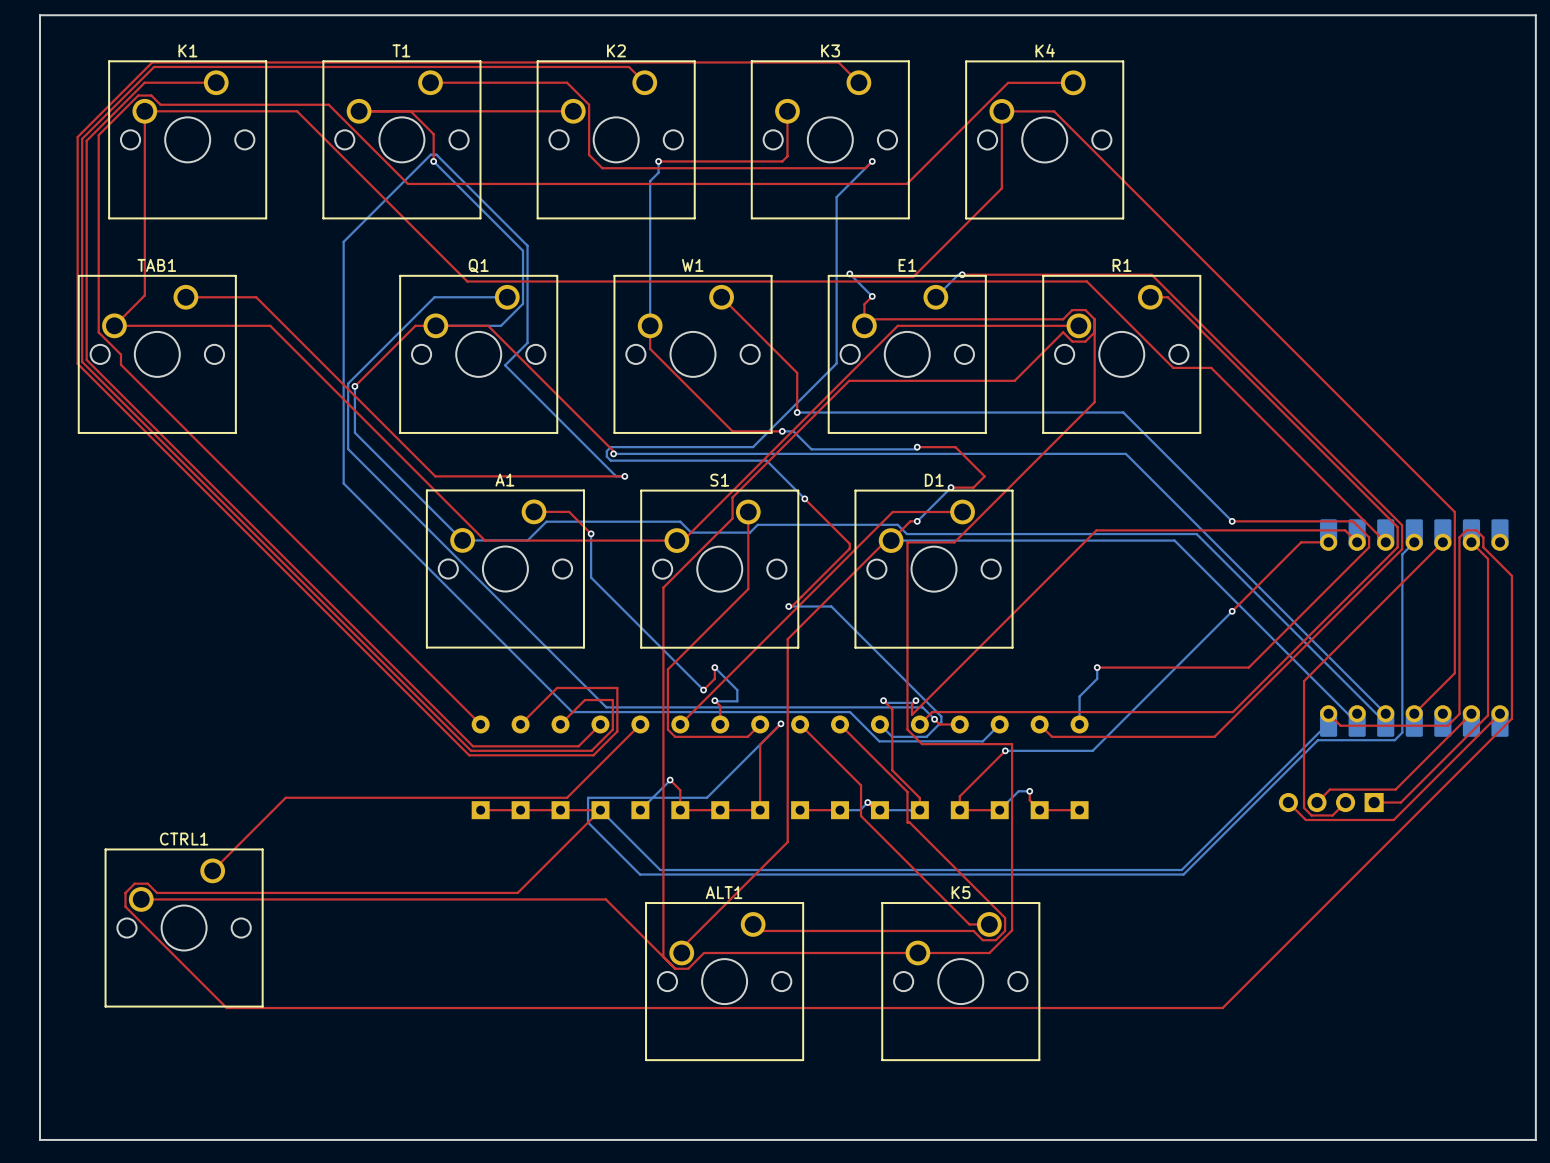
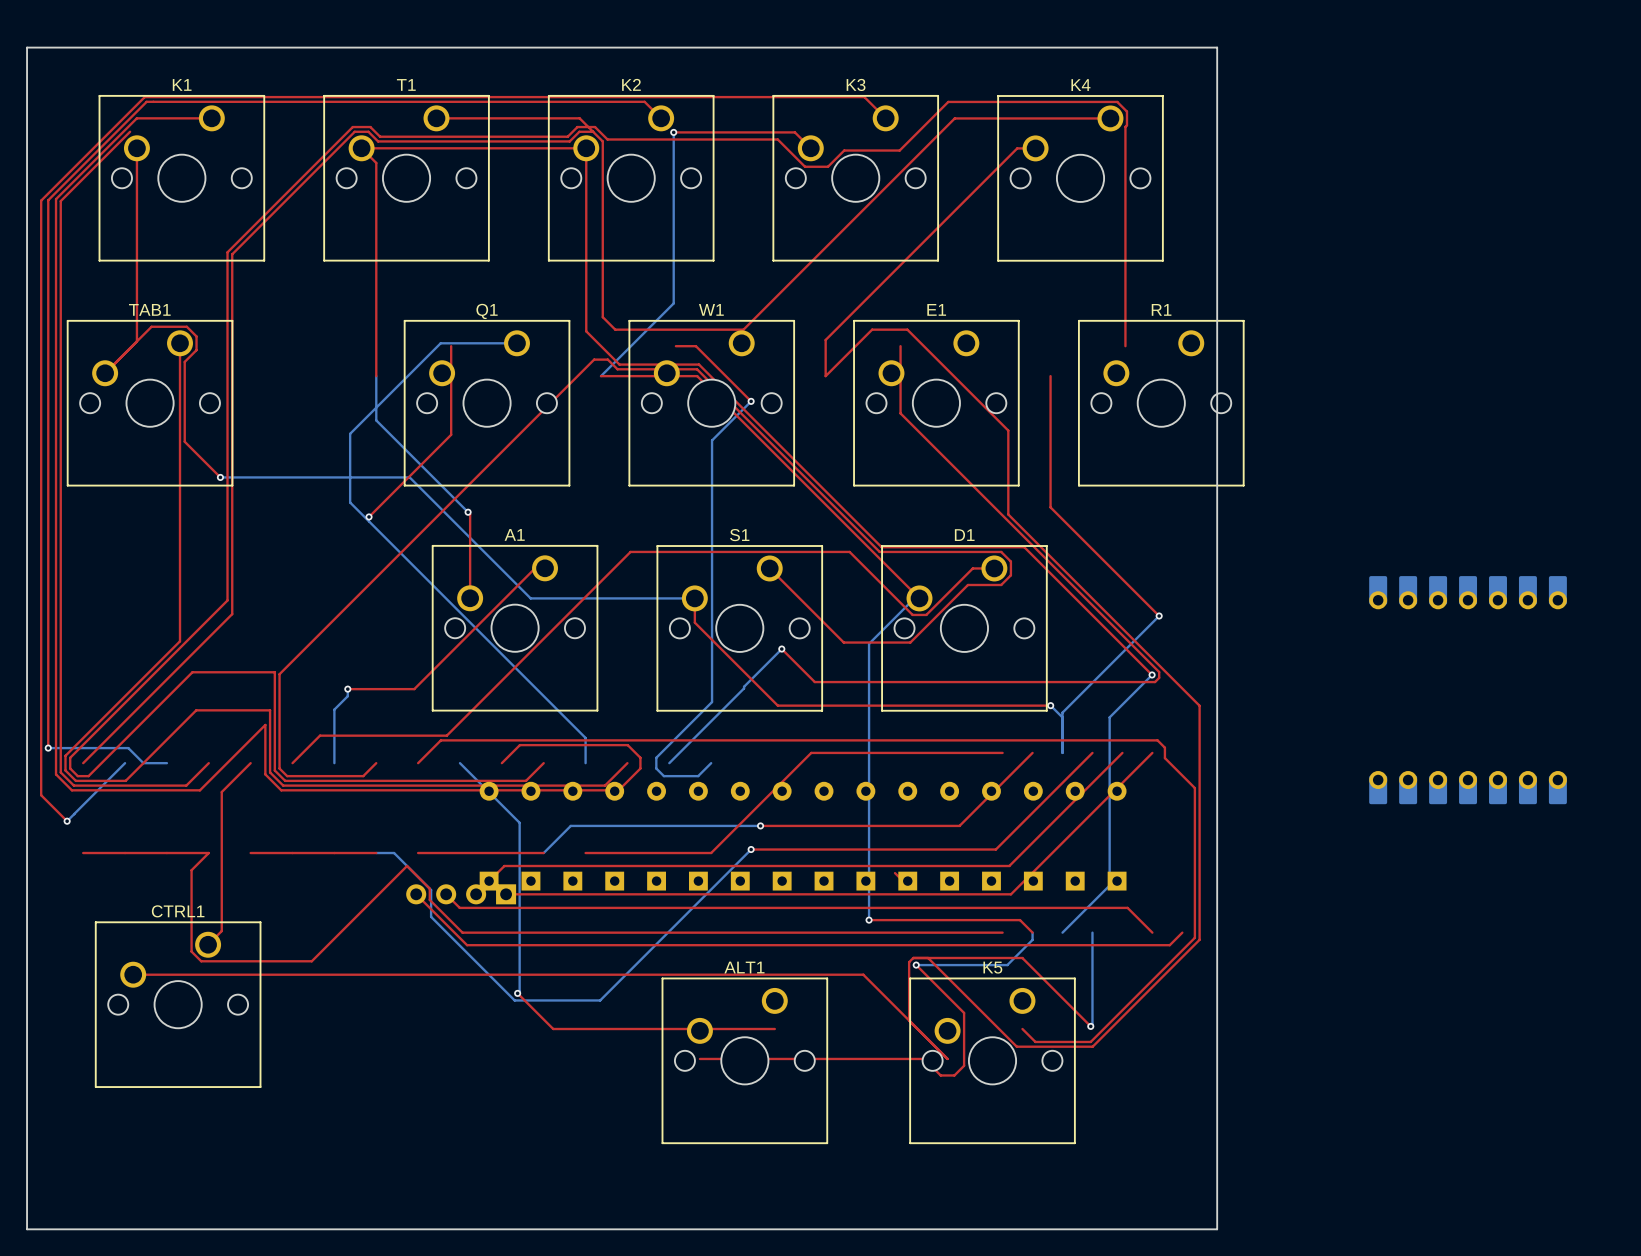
board edge: (1175, 15) (1535, 15) (1535, 1139) (40, 1139) -> (1217, 47) (1217, 1229) (27, 1229) (27, 1226)
top track: (1008, 82) (907, 183) (407, 183) (328, 104) (160, 104) (151, 95) (138, 95) -> none
top track: none -> (593, 131) (579, 131) (569, 141) (378, 141) (368, 131) (354, 131) (232, 254) (232, 614) (83, 763)
bottom track: none -> (673, 132) (673, 303) (601, 376)
top track: (144, 111) (297, 111) (467, 281) (1086, 281) (1173, 367) (1211, 367) (1385, 542) -> none
top track: none -> (361, 148) (376, 162) (376, 376)
top track: (410, 111) (433, 134) (433, 161) -> none
top track: none -> (586, 148) (586, 331) (619, 364) (699, 364) (881, 547) (1024, 547) (1152, 674)
top track: (787, 111) (787, 156) (782, 161) (658, 161) -> (810, 148) (794, 132) (673, 132)
top track: none -> (1035, 148) (1017, 148) (825, 339) (825, 376) (872, 329) (907, 329) (1008, 430) (1008, 514) (1199, 705) (1199, 939) (1092, 1046) (1016, 1046) (928, 957)
top track: (98, 135) (98, 332) (120, 354) (120, 364) (480, 724) -> (88, 173) (60, 201) (60, 772) (73, 785) (186, 785) (208, 763)
top track: (77, 137) (77, 363) (469, 755) (593, 755) (617, 731) (617, 687) (557, 687) (520, 724) -> (66, 175) (41, 200) (41, 795) (67, 821)
top track: (82, 138) (82, 361) (471, 750) (591, 750) (612, 729) (612, 700) (584, 700) (560, 724) -> (71, 177) (48, 200) (48, 748)
top track: (86, 140) (86, 359) (472, 746) (578, 746) (600, 724) -> (75, 179) (56, 199) (56, 774) (71, 790) (199, 790) (265, 724) (265, 774) (281, 790) (618, 790) (640, 768) (640, 757) (627, 745) (519, 745) (501, 763)
top track: (589, 154) (602, 168) (865, 168) (872, 161) -> (602, 194) (602, 317) (615, 329) (743, 329) (954, 118) (1042, 118)
bottom track: (433, 161) (523, 250) (523, 303) (500, 325) (435, 325) -> none
via: (433, 161) -> none
bottom track: (658, 161) (658, 172) (650, 181) (650, 325) -> none
via position: (658, 161) -> (673, 132)
bottom track: (872, 161) (836, 197) (836, 363) (753, 447) (610, 447) (606, 451) (606, 456) (610, 460) (766, 460) (804, 498) -> none
via: (872, 161) -> none
top track: (849, 273) (852, 276) (913, 276) (1001, 188) (1001, 111) (1054, 111) (1454, 512) (1454, 673) (1414, 713) -> none
bottom track: (849, 273) (872, 296) -> none
via: (849, 273) -> none
top track: (962, 274) (1151, 274) (1402, 525) (1402, 549) (1214, 736) (1052, 736) (1039, 724) -> none
bottom track: (962, 274) (958, 274) (935, 297) -> none
via: (962, 274) -> none
top track: none -> (136, 341) (151, 326) (186, 326) (196, 336) (196, 350) (184, 361) (184, 441) (220, 477)
top track: (872, 296) (864, 304) (864, 325) (870, 319) (1063, 319) (1072, 310) (1085, 310) (1094, 319) (1094, 402) (978, 518) -> (376, 763) (363, 776) (287, 776) (279, 768) (279, 674) (594, 359) (607, 359) (617, 369) (697, 369) (879, 551) (1001, 551) (1010, 561) (1010, 575)
via: (872, 296) -> none
top track: (185, 297) (256, 297) (435, 476) (624, 476) -> (180, 343) (180, 641) (65, 755) (65, 770) (75, 780) (125, 780) (196, 710) (270, 710) (270, 772) (283, 785) (605, 785) (627, 763)
top track: (721, 297) (797, 372) (797, 412) -> none
top track: (1150, 297) (1167, 297) (1397, 527) (1397, 547) (1232, 712) (932, 712) (919, 724) -> none
top track: none -> (451, 346) (451, 434) (369, 516)
top track: none -> (675, 346) (695, 346) (751, 401)
top track: none -> (900, 346) (900, 413) (1159, 672) (1159, 677) (1155, 682) (814, 682) (781, 649)
top track: none -> (1125, 346) (1126, 111) (1117, 101) (948, 101) (899, 150) (844, 150) (828, 166) (805, 166) (777, 139) (607, 139) (595, 127) (577, 127) (567, 136) (380, 136) (370, 127) (352, 127) (227, 252) (227, 600) (70, 757) (70, 768) (77, 776) (88, 776) (192, 672) (274, 672) (274, 770) (285, 780) (526, 780) (543, 763)
top track: (114, 325) (270, 325) (485, 540) (683, 540) (897, 325) (1078, 325) -> none
top track: (650, 325) (650, 348) (732, 431) (782, 431) -> none
bottom track: none -> (376, 376) (376, 420) (468, 512)
top track: none -> (601, 376) (697, 376) (919, 598)
top track: none -> (1050, 376) (1050, 507) (1159, 616)
top track: (1094, 332) (1085, 341) (1072, 341) (1063, 332) (1014, 380) (849, 380) (732, 497) (732, 518) (663, 587) (663, 956) -> none
bottom track: none -> (751, 401) (712, 440) (712, 702) (656, 757) (656, 768) (663, 776) (698, 776) (711, 763)
via: none -> (751, 401)
top track: (354, 386) (415, 325) (488, 325) (613, 451) (613, 453) -> none
bottom track: (354, 386) (354, 432) (462, 540) (527, 540) (546, 521) (680, 521) (691, 532) (750, 532) (757, 524) (897, 524) (906, 534) (1196, 534) (1385, 723) -> none
via: (354, 386) -> none
bottom track: (797, 412) (1123, 412) (1232, 521) -> none
via: (797, 412) -> none
bottom track: none -> (220, 477) (409, 477) (530, 598) (694, 598)
via: none -> (220, 477)
bottom track: (782, 431) (793, 431) (811, 449) (917, 449) (917, 447) -> none
via: (782, 431) -> none
top track: (917, 447) (955, 447) (984, 476) (973, 487) (951, 487) -> none
via: (917, 447) -> none
bottom track: (613, 453) (1125, 453) (1385, 713) -> none
via: (613, 453) -> none
top track: none -> (468, 512) (470, 514) (470, 598)
via: none -> (468, 512)
via: none -> (369, 516)
bottom track: (624, 476) (616, 476) (505, 365) (527, 342) (527, 245) (436, 154) (430, 154) (343, 241) (343, 483) (572, 712) (850, 712) (879, 741) (982, 741) (999, 724) -> none
via: (624, 476) -> none
bottom track: (951, 487) (917, 521) -> none
via: (951, 487) -> none
top track: (804, 498) (849, 543) (849, 548) (791, 606) (788, 606) -> none
via: (804, 498) -> none
top track: (534, 511) (569, 511) (591, 533) -> (545, 568) (535, 568) (414, 689) (347, 689)
top track: (748, 512) (748, 589) (667, 669) (667, 729) (675, 736) (747, 736) (760, 724) -> (769, 568) (843, 642) (910, 642) (967, 584) (1001, 584)
top track: (942, 512) (892, 512) (680, 724) -> (972, 568) (926, 614) (912, 614) (849, 551) (630, 551) (446, 735) (320, 735) (292, 763)
top track: (917, 521) (910, 521) (891, 540) (886, 540) (787, 639) (787, 842) (681, 948) (681, 953) -> none
via: (917, 521) -> none
top track: (1232, 521) (1353, 521) (1369, 537) (1369, 547) (1248, 667) (1097, 667) -> none
via: (1232, 521) -> none
top track: (969, 527) (954, 542) (907, 542) (907, 729) (922, 744) (1012, 744) (1012, 930) (989, 953) (704, 953) (688, 968) (675, 968) (605, 899) -> (947, 1058) (863, 974) (620, 974)
bottom track: (591, 533) (591, 577) (703, 690) -> none
via: (591, 533) -> none
top track: none -> (694, 598) (694, 622) (777, 705) (1050, 705)
bottom track: (891, 540) (1174, 540) (1357, 723) -> (919, 598) (914, 598) (869, 643) (869, 920)
top track: (1328, 542) (1301, 542) (1232, 611) -> none
top track: (1357, 542) (1345, 530) (1096, 530) (912, 714) (912, 704) (915, 700) -> none
bottom track: (1414, 542) (1402, 554) (1402, 732) (1394, 740) (1317, 740) (1183, 874) (640, 874) (588, 822) (588, 797) (706, 797) (780, 723) -> none
top track: (1442, 542) (1304, 681) (1304, 807) (1311, 815) (1332, 815) (1345, 802) -> none
top track: (1471, 542) (1488, 558) (1488, 715) (1400, 802) (1374, 802) -> none
bottom track: none -> (1159, 616) (1062, 712) (1062, 752)
via: none -> (1159, 616)
bottom track: none -> (781, 649) (669, 763)
bottom track: (788, 606) (831, 606) (941, 716) (941, 722) (926, 736) (892, 736) (879, 724) -> none
via position: (788, 606) -> (781, 649)
bottom track: (1232, 611) (1092, 750) (1005, 750) -> none
via: (1232, 611) -> none
bottom track: none -> (1152, 674) (1109, 717) (1109, 885) (1062, 932)
via: none -> (1152, 674)
bottom track: none -> (347, 689) (347, 696) (334, 709) (334, 763)
via: none -> (347, 689)
bottom track: none -> (1050, 705) (1062, 717)
via: none -> (1050, 705)
top track: (714, 667) (714, 678) (703, 690) -> none
bottom track: (714, 667) (737, 690) (737, 701) (714, 700) -> none
via: (714, 667) -> none
bottom track: (1097, 667) (1097, 678) (1079, 696) (1079, 724) -> none
via: (1097, 667) -> none
bottom track: (572, 673) (606, 707) (922, 707) (934, 719) -> (585, 737) (585, 763)
bottom track: none -> (48, 748) (128, 748) (143, 763) (166, 763)
via: none -> (48, 748)
top track: none -> (1002, 752) (811, 752) (711, 853) (585, 853)
top track: none -> (1032, 752) (959, 825) (760, 825)
top track: none -> (1092, 752) (995, 849) (751, 849)
top track: none -> (1122, 752) (1009, 866) (504, 866) (476, 894)
top track: none -> (1152, 752) (1010, 894) (506, 894)
via: (703, 690) -> none
top track: none -> (418, 763) (440, 740) (1157, 740) (1164, 747) (1164, 758) (1194, 788) (1194, 937) (1090, 1041) (1035, 1041) (1022, 1029)
bottom track: none -> (459, 763) (519, 822) (519, 991) (517, 993)
top track: (714, 700) (720, 706) (720, 724) -> none
via: (714, 700) -> none
top track: (883, 700) (892, 709) (892, 770) (919, 797) (919, 810) (912, 810) -> none
bottom track: (883, 700) (885, 702) (913, 702) (915, 700) -> none
via: (883, 700) -> none
via: (915, 700) -> none
top track: (1328, 713) (1340, 725) (1447, 725) (1459, 714) (1459, 537) (1466, 530) (1476, 530) (1483, 537) (1483, 547) (1511, 575) (1511, 718) (1222, 1008) (226, 1008) (125, 906) (125, 892) (134, 883) (147, 883) (157, 892) (517, 892) (600, 810) (480, 810) -> none
top track: (1471, 713) (1395, 789) (1329, 789) (1316, 802) -> none
top track: (1500, 713) (1393, 819) (1305, 819) (1288, 802) -> none
top track: (934, 719) (939, 724) (959, 724) -> none
via: (934, 719) -> none
top track: (780, 723) (760, 744) (760, 810) (680, 810) (680, 790) (670, 780) -> none
via: (780, 723) -> none
bottom track: (1328, 723) (1181, 870) (660, 870) (600, 810) -> none
top track: (640, 724) (567, 797) (285, 797) (225, 857) -> (250, 763) (221, 792) (221, 931)
top track: (800, 724) (861, 785) (861, 816) (969, 924) (989, 924) -> none
top track: (840, 724) (907, 791) (907, 822) (909, 822) (1005, 917) (1005, 930) (995, 940) (982, 940) (973, 930) (759, 930) (753, 924) -> none
top track: (1005, 750) (959, 796) (959, 810) (999, 810) -> none
via: (1005, 750) -> none
via: none -> (67, 821)
bottom track: none -> (760, 825) (570, 825) (543, 853)
via: none -> (760, 825)
bottom track: (670, 780) (640, 810) -> none
via: (670, 780) -> none
bottom track: none -> (751, 849) (600, 1000) (514, 1000) (431, 916) (431, 890) (394, 853) (376, 853)
via: none -> (751, 849)
top track: none -> (83, 853) (208, 853) (191, 870) (191, 951) (201, 961) (311, 961) (407, 866) (429, 888) (429, 899) (462, 932) (1002, 932)
top track: none -> (250, 853) (376, 853)
top track: none -> (418, 853) (543, 853)
top track: (1029, 791) (1029, 800) (1039, 810) (1079, 810) -> none
bottom track: (1029, 791) (1018, 791) (999, 810) -> none
via: (1029, 791) -> none
bottom track: (867, 802) (860, 810) (840, 810) -> none
via: (867, 802) -> none
part: (1331, 802) -> none
top track: (800, 810) (840, 810) -> none
bottom track: (879, 810) (910, 810) (914, 813) -> none
top track: none -> (416, 894) (467, 945) (1169, 945) (1182, 932)
top track: none -> (446, 894) (459, 907) (1127, 907) (1152, 932)
part: none -> (461, 894)
top track: none -> (869, 920) (1020, 920) (1032, 932)
via: none -> (869, 920)
bottom track: none -> (1032, 932) (1032, 939) (1007, 965) (916, 965)
bottom track: none -> (1092, 932) (1092, 1024) (1090, 1026)
top track: none -> (916, 965) (964, 1012) (964, 1065) (954, 1075) (940, 1075) (924, 1058) (699, 1058)
via: none -> (916, 965)
top track: none -> (517, 993) (553, 1029) (774, 1029)
via: none -> (517, 993)
top track: none -> (909, 1020) (909, 962) (913, 957) (1022, 957) (1090, 1026)
via: none -> (1090, 1026)

